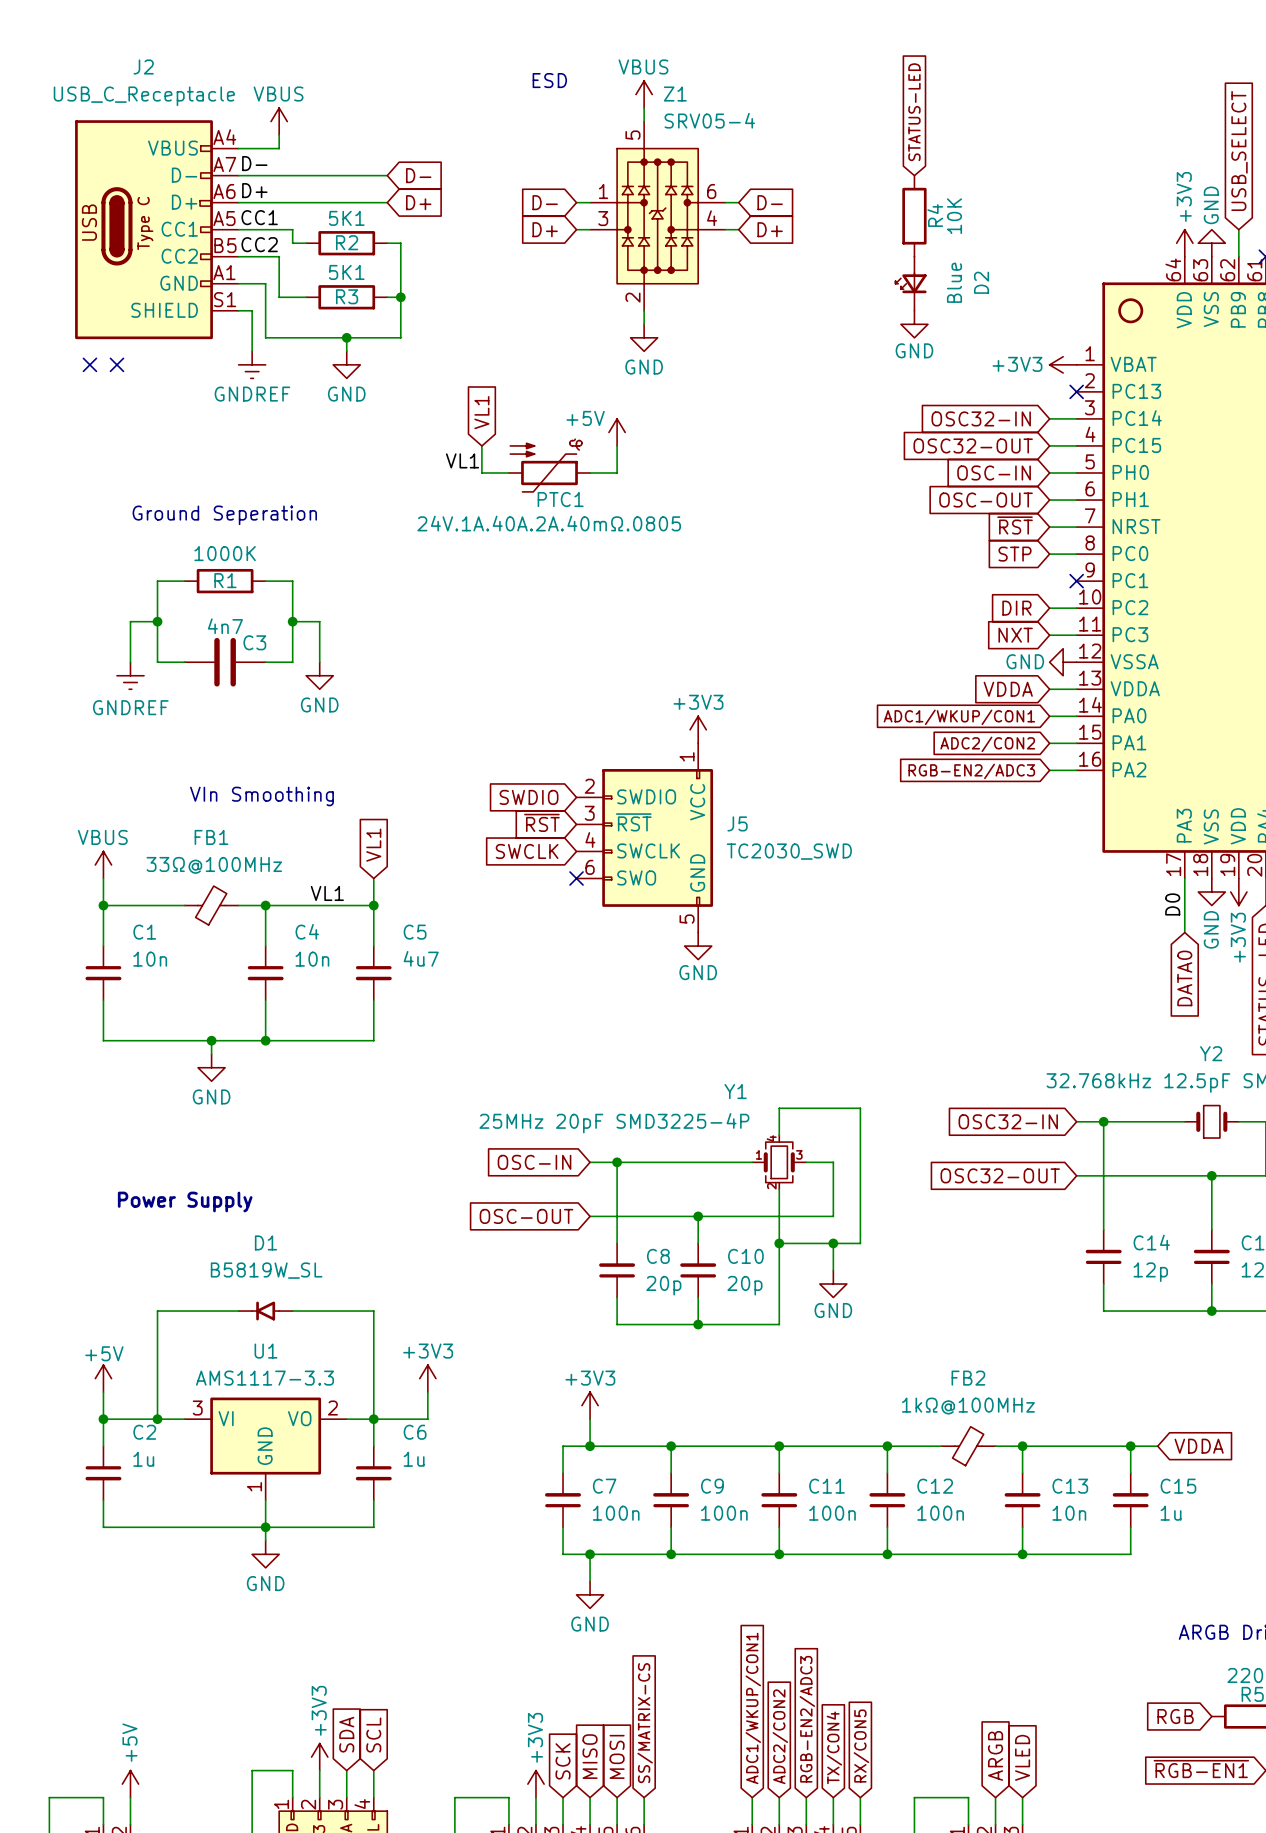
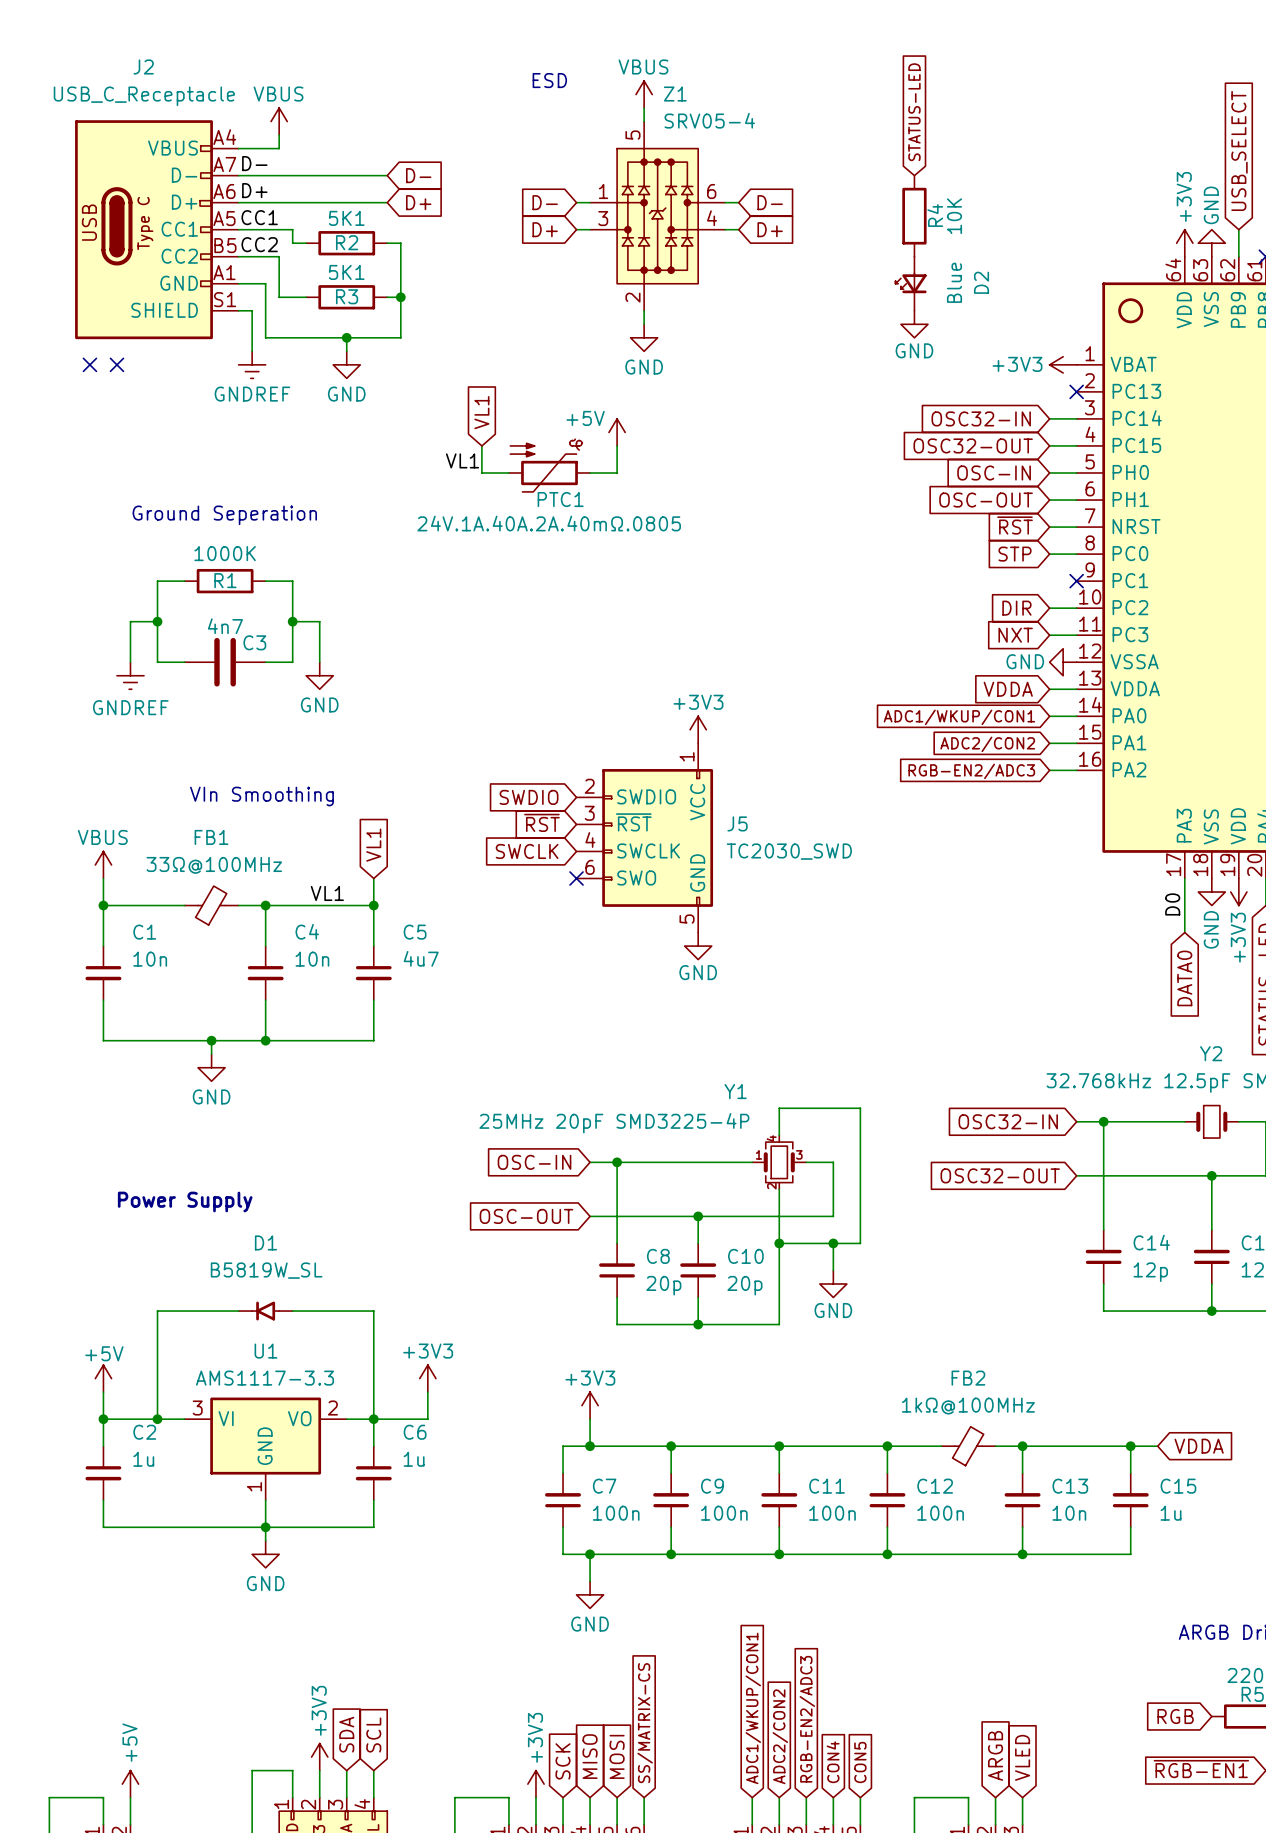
global label: RX/CON5 (861, 1746) -> CON5 (860, 1762)
global label: TX/CON4 (834, 1747) -> CON4 (833, 1762)

